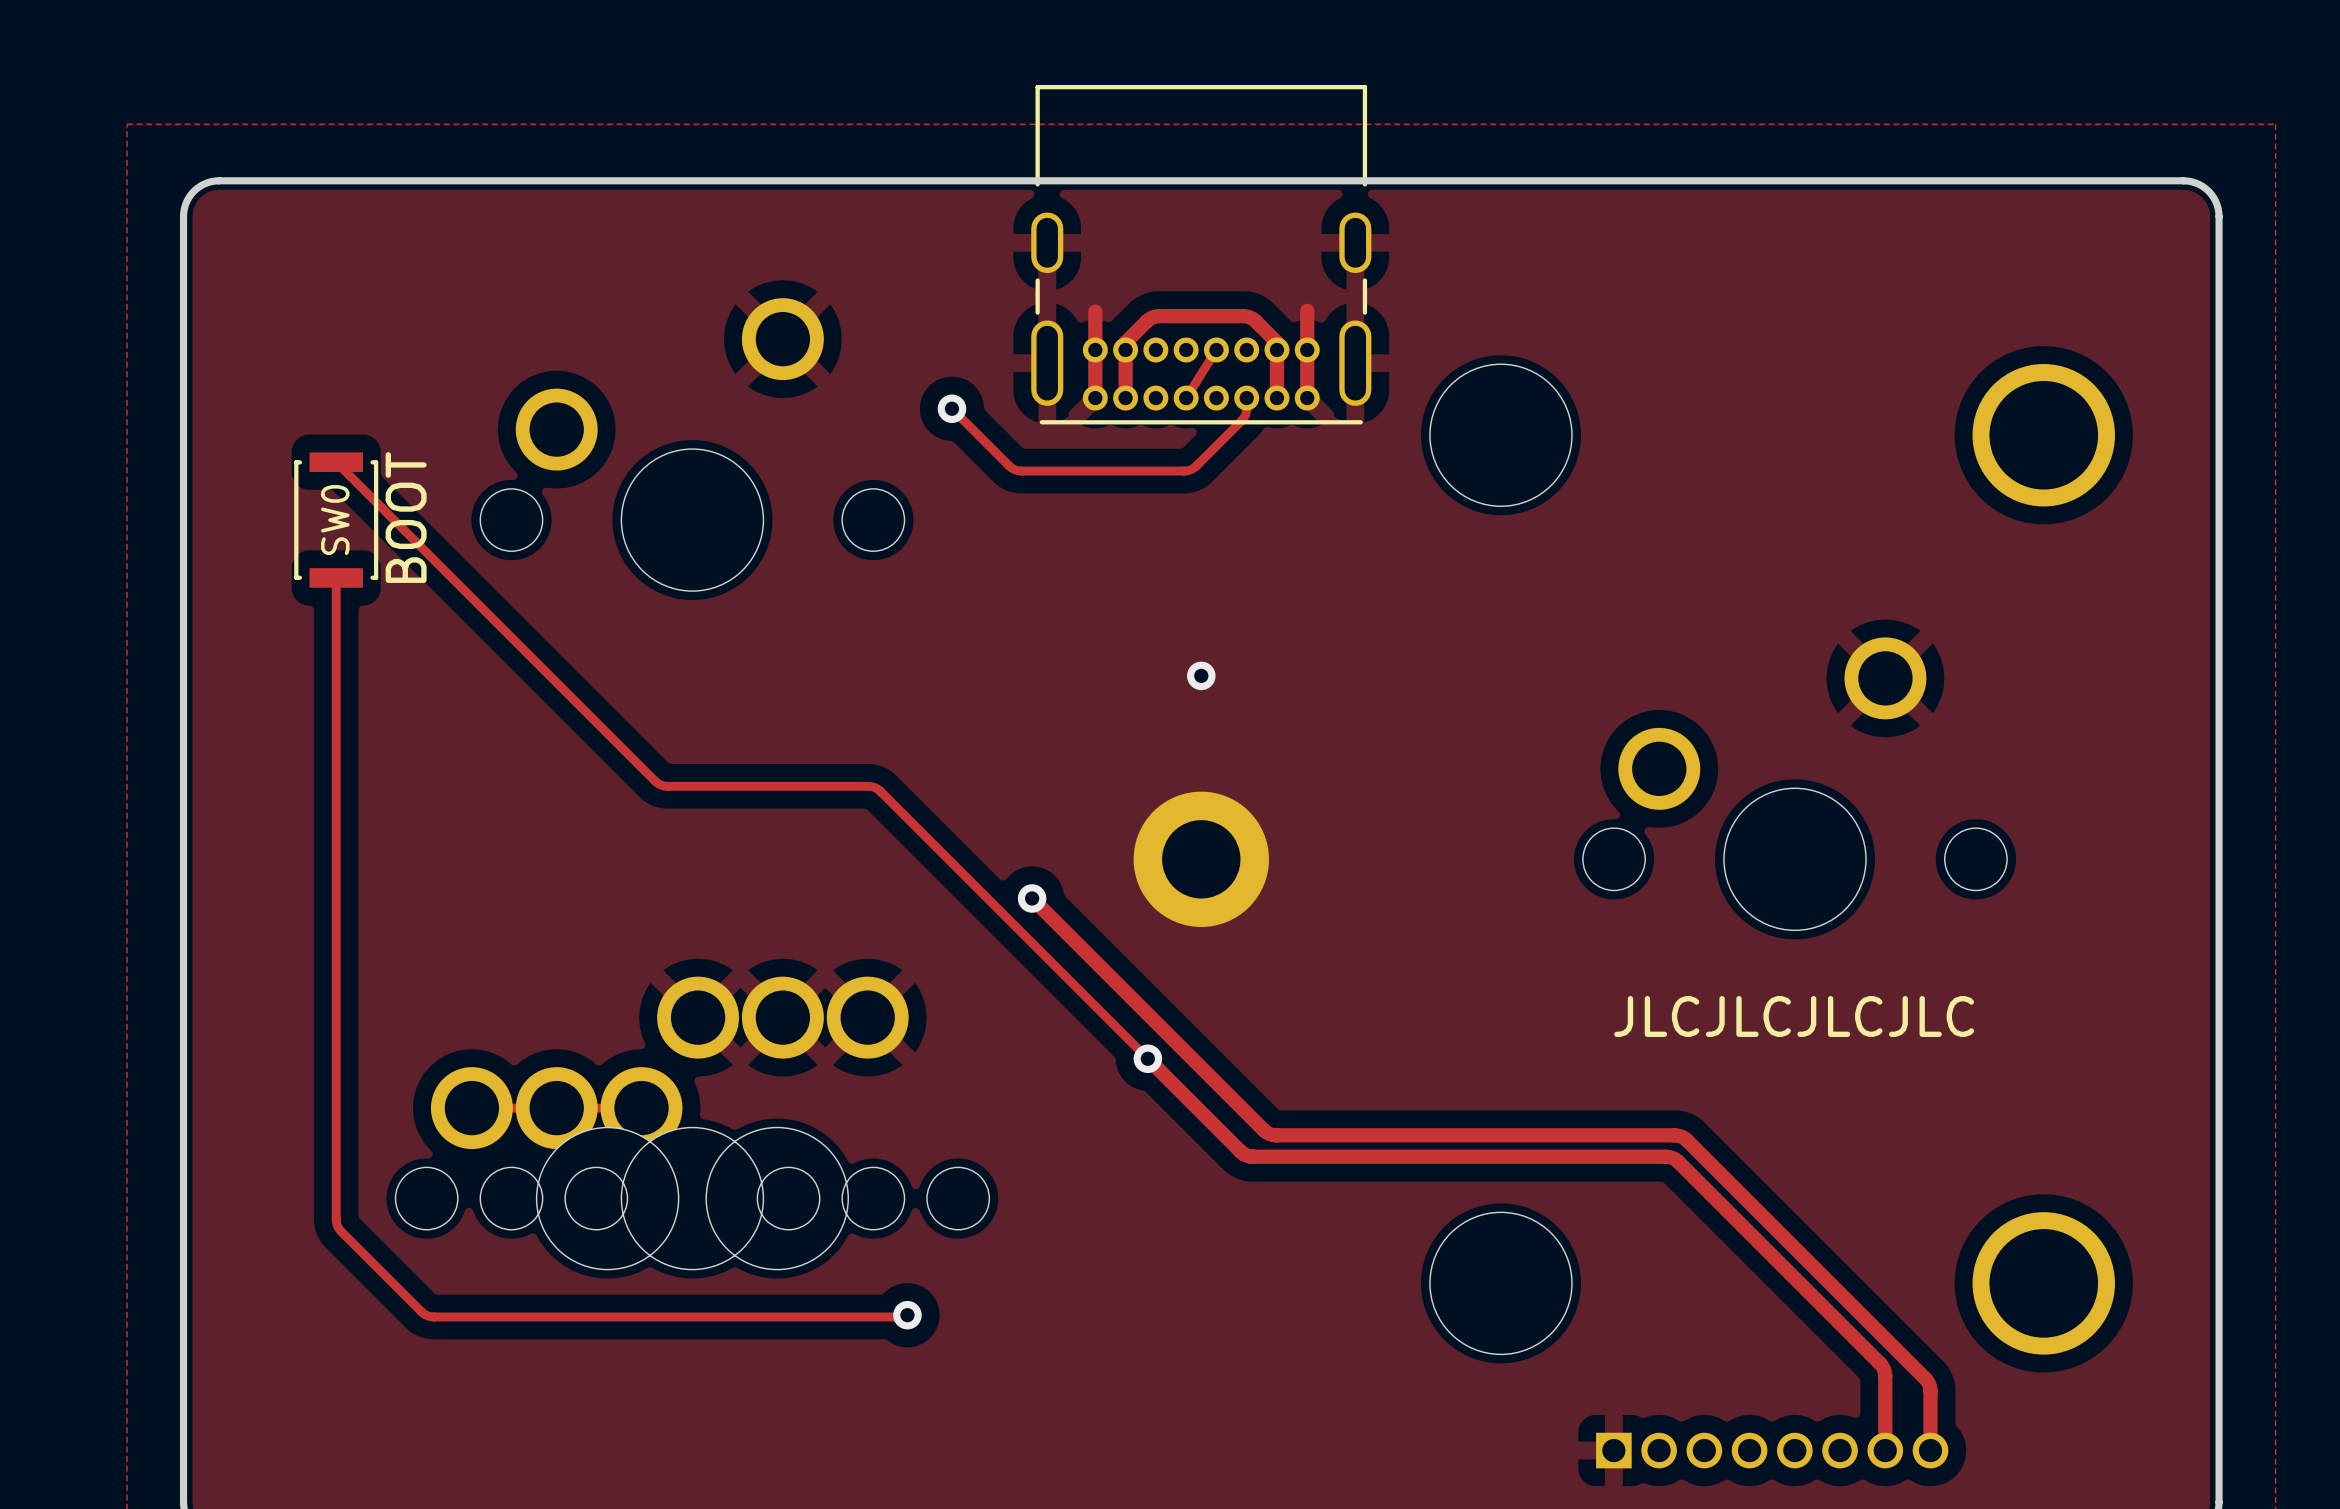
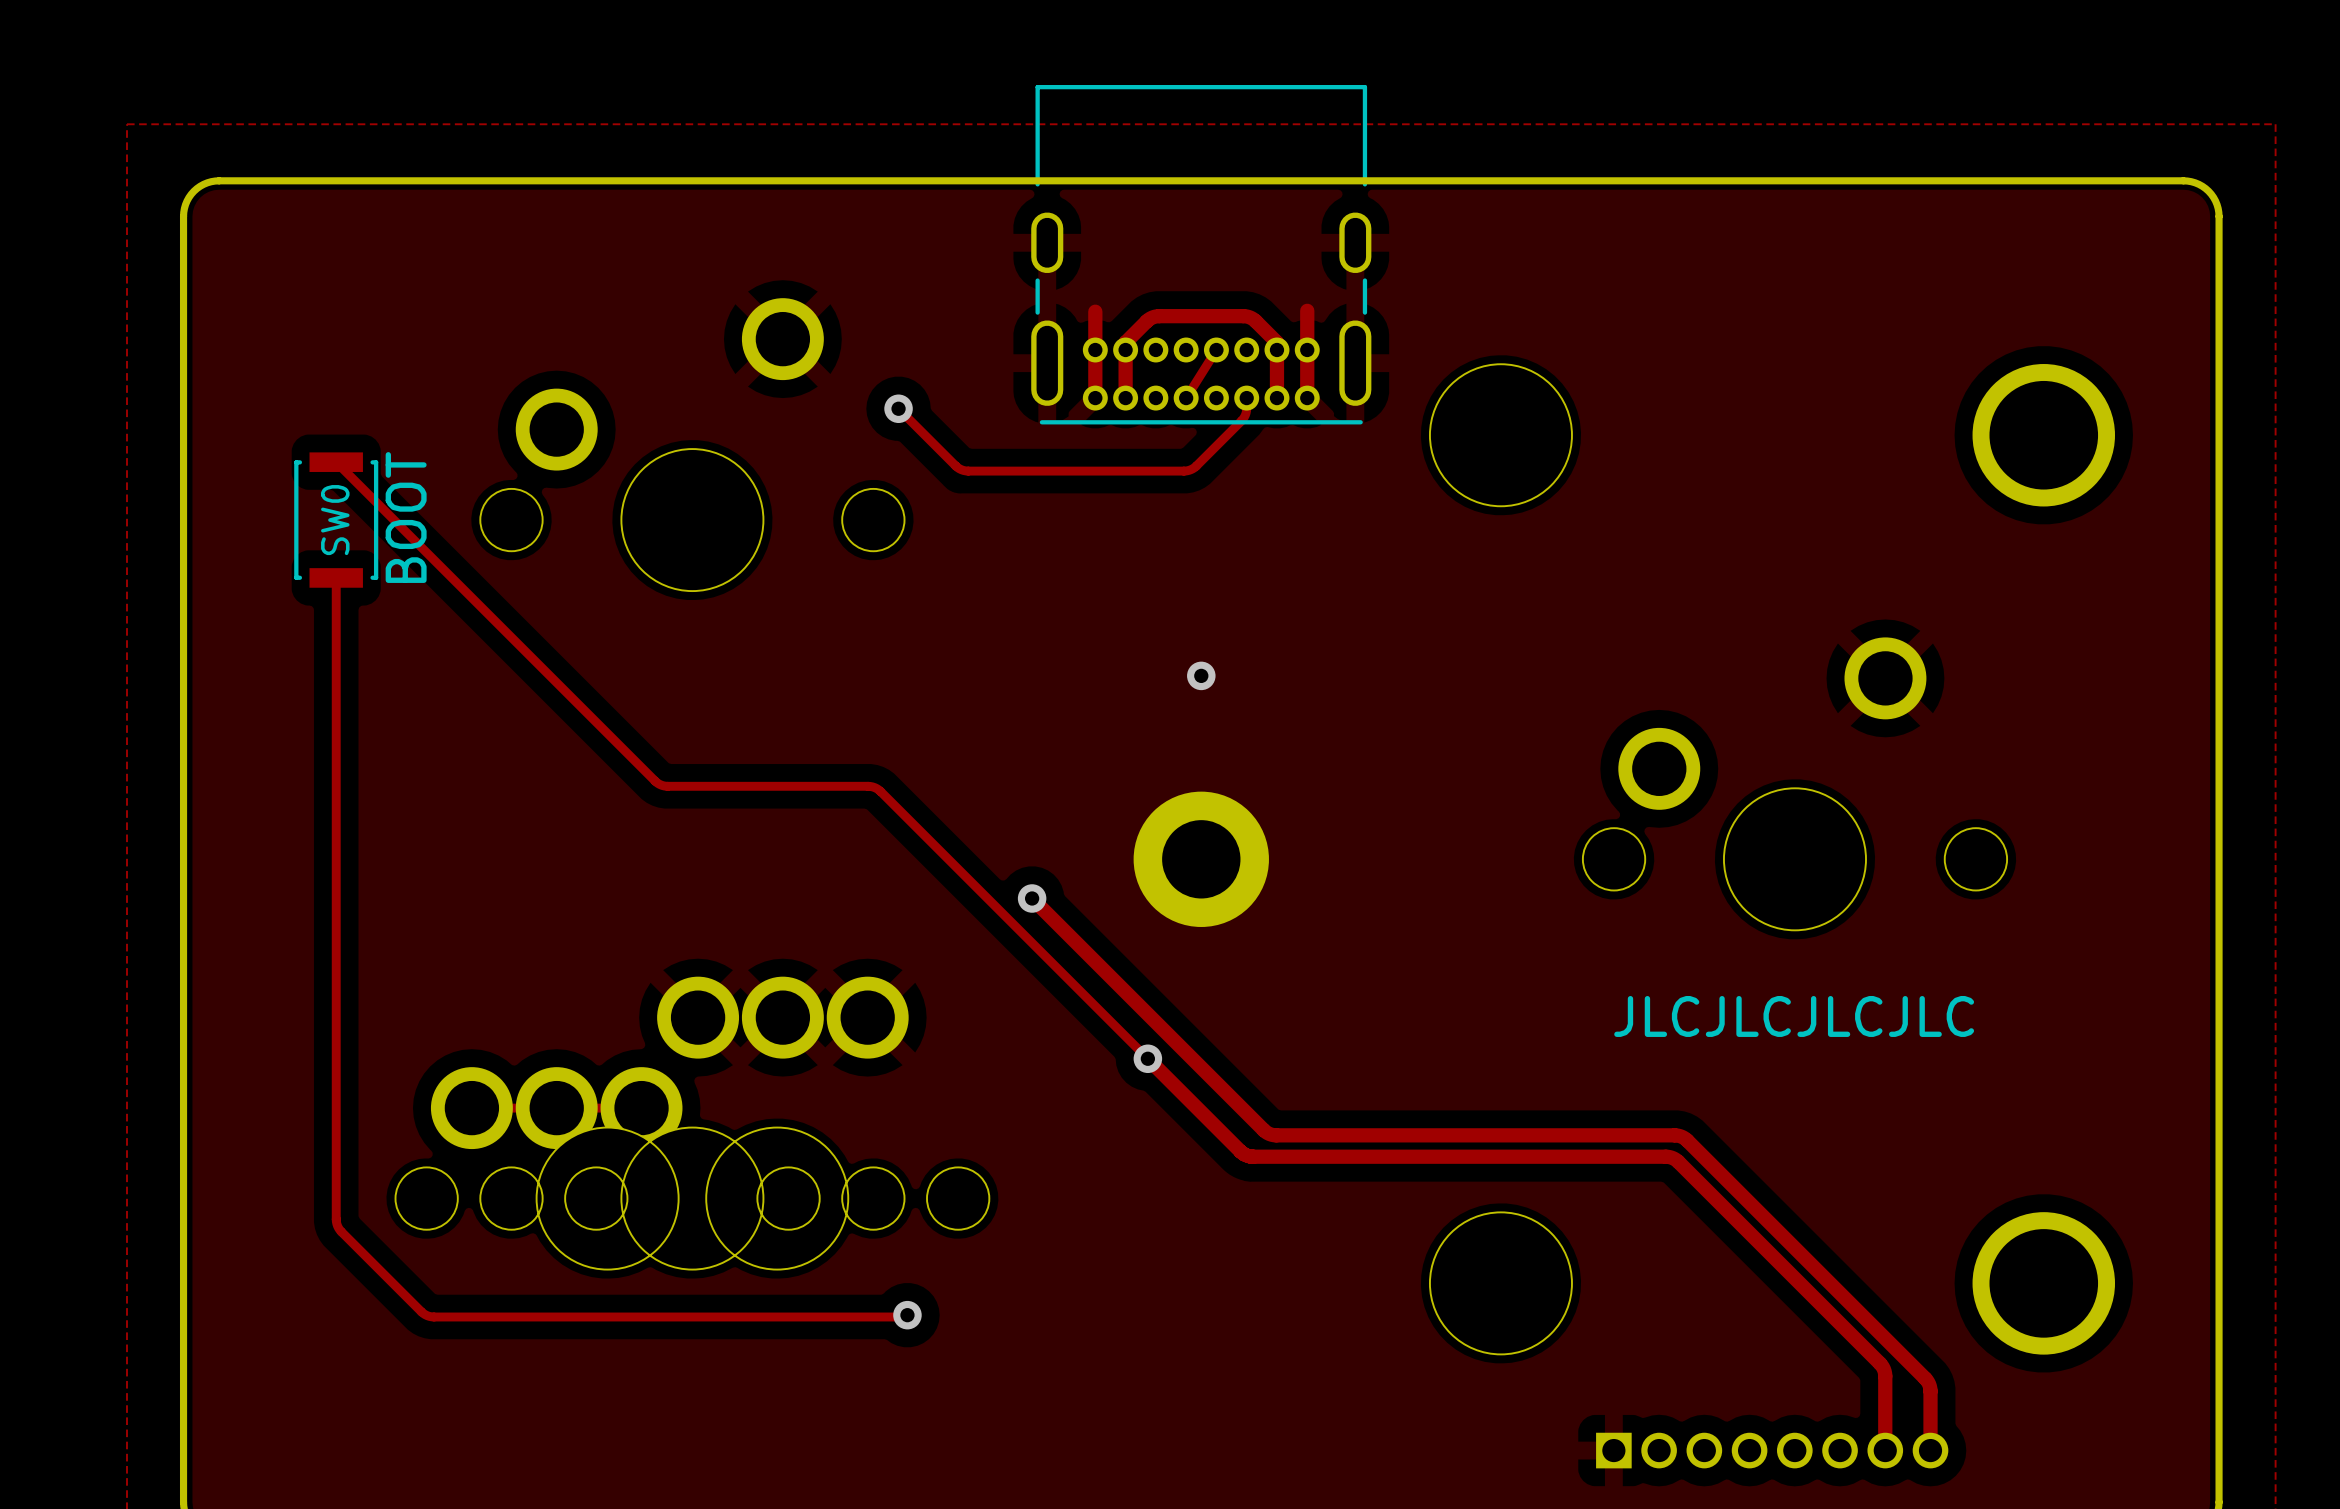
track: (951, 408) (1009, 465) (1021, 471) -> (898, 408) (959, 468) (968, 471) (1021, 471)
via position: (951, 408) -> (898, 408)

